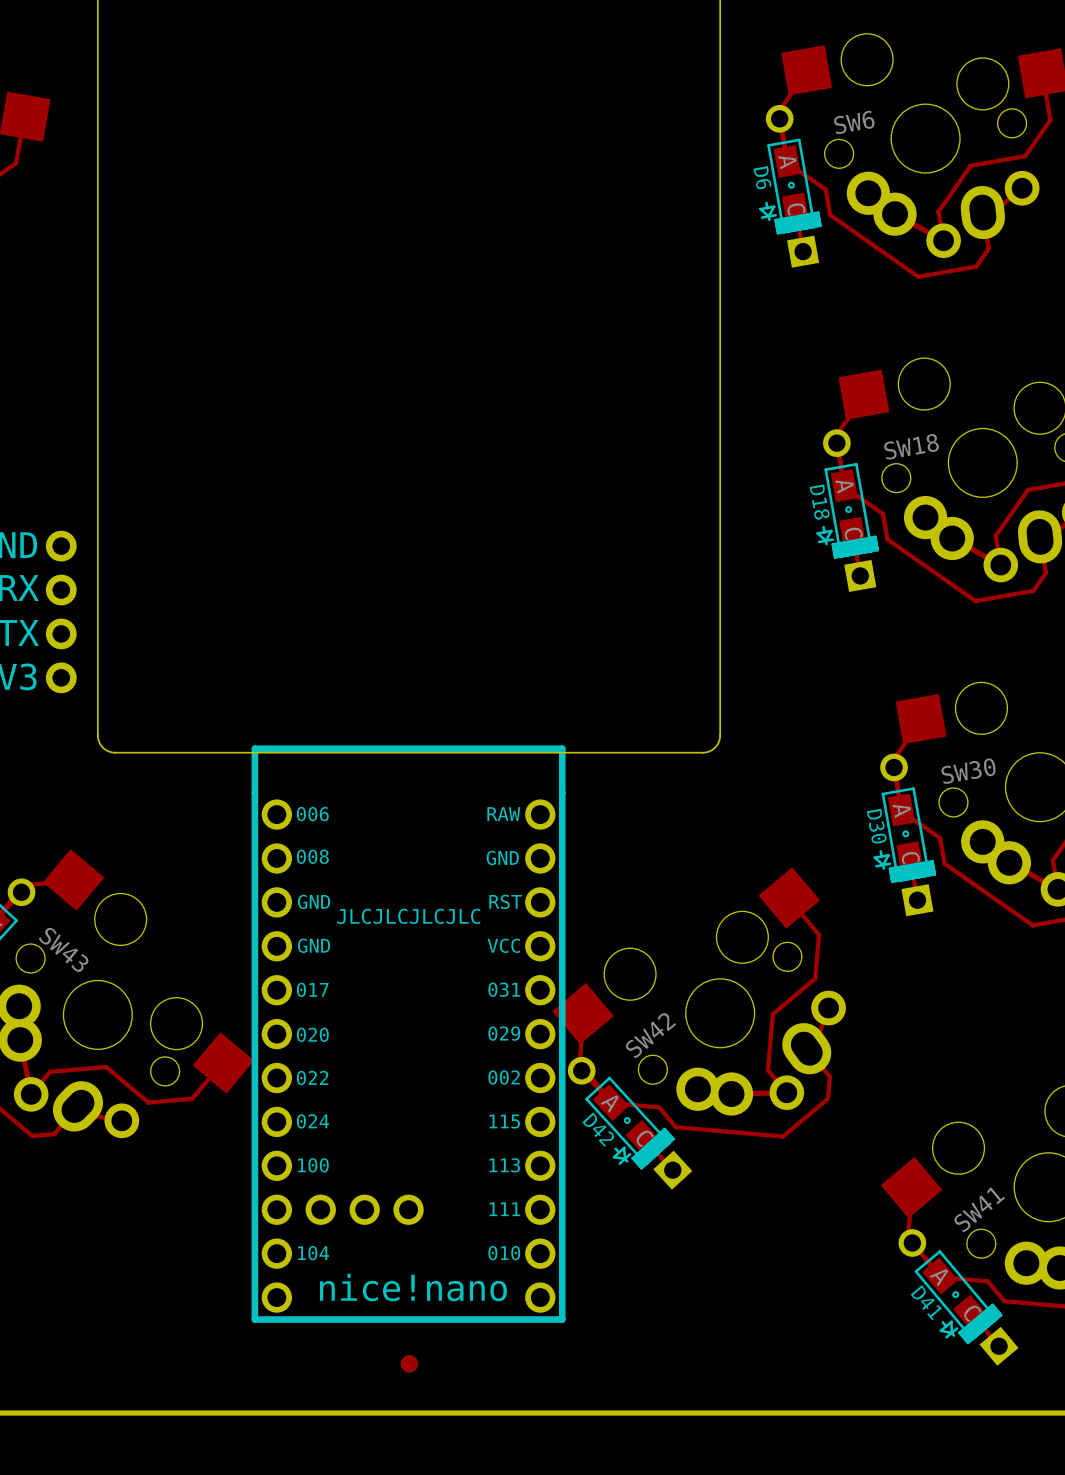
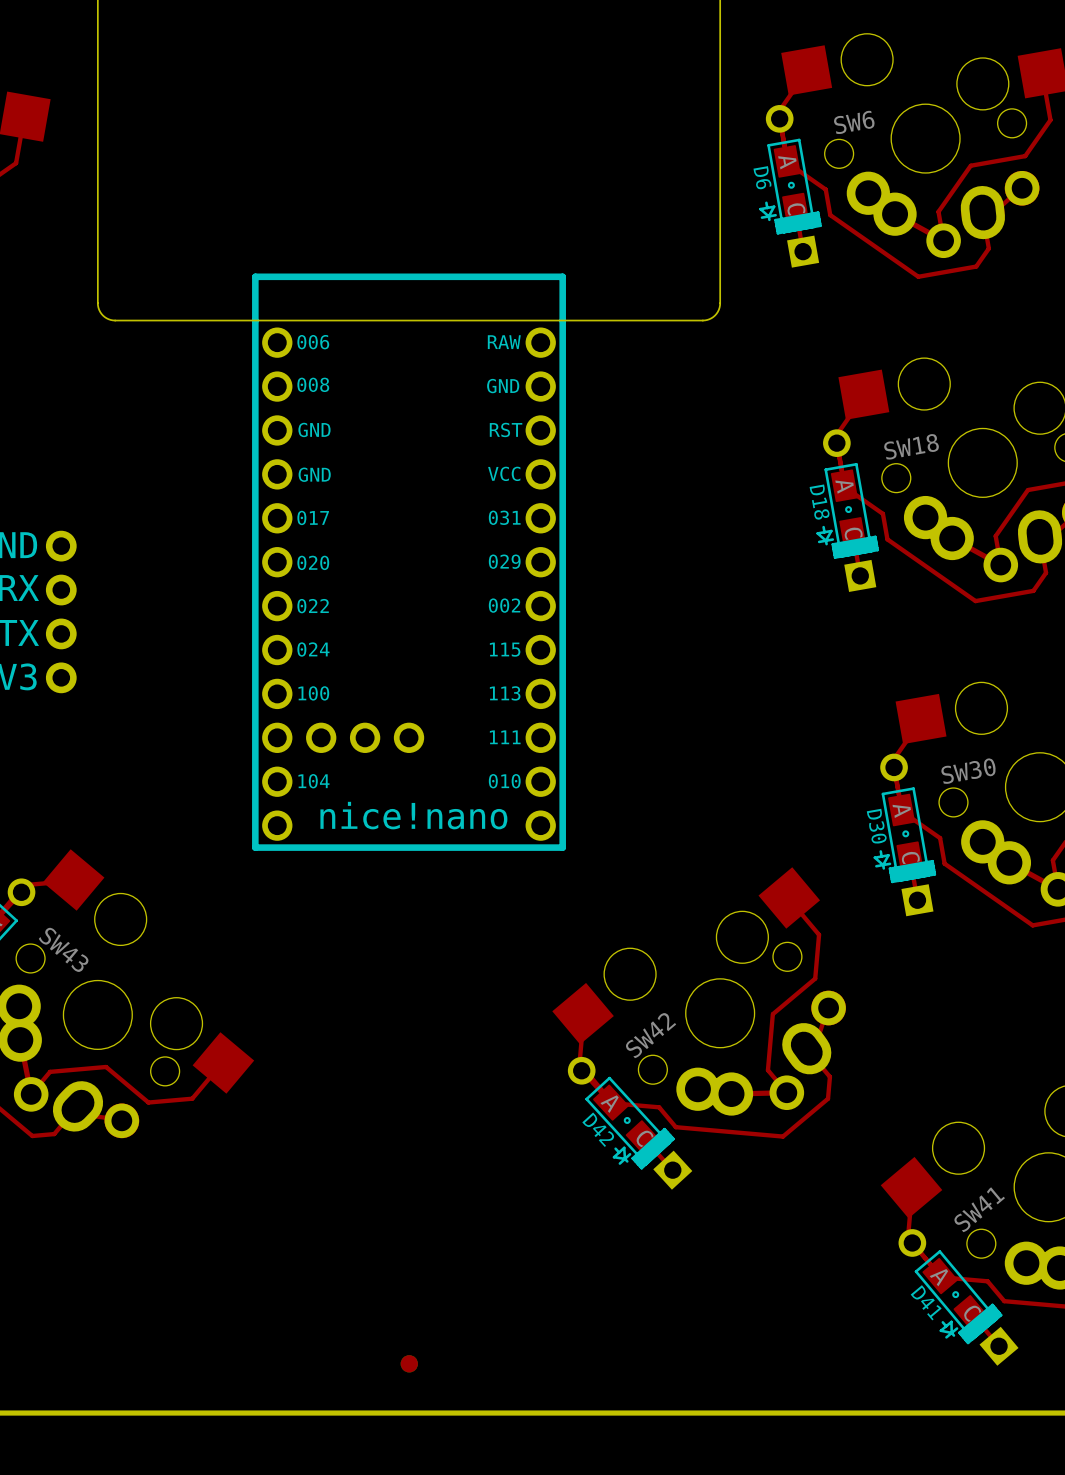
board edge: (97, 303) (97, 735) (102, 747) (115, 752) (702, 752) (713, 749) (717, 744) (720, 735) (720, 303) -> (97, 303) (102, 315) (115, 320) (702, 320) (715, 315) (720, 303)
part: none -> (409, 562)
text: JLCJLCJLCJLC (408, 916) -> none
part: (408, 1034) -> none

